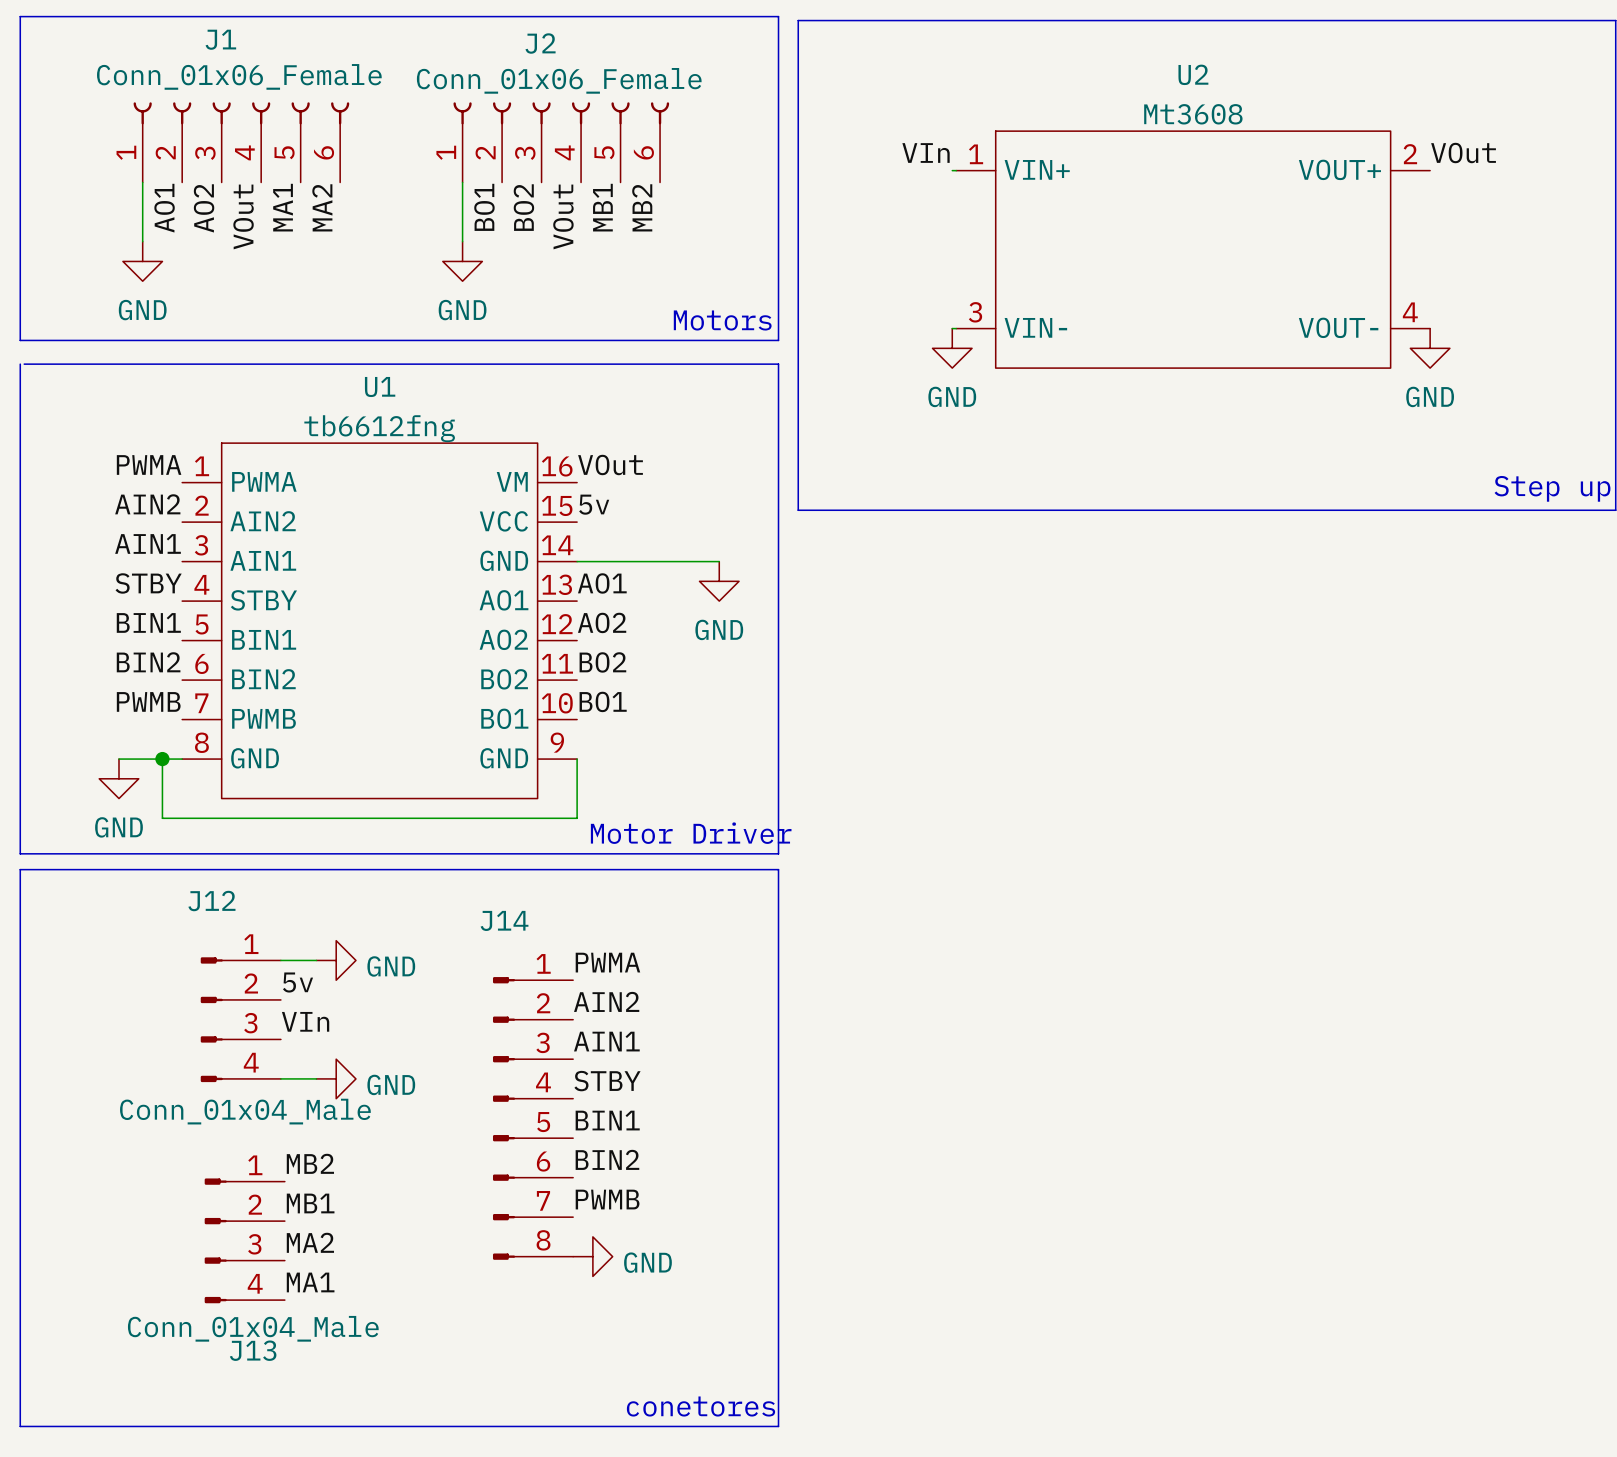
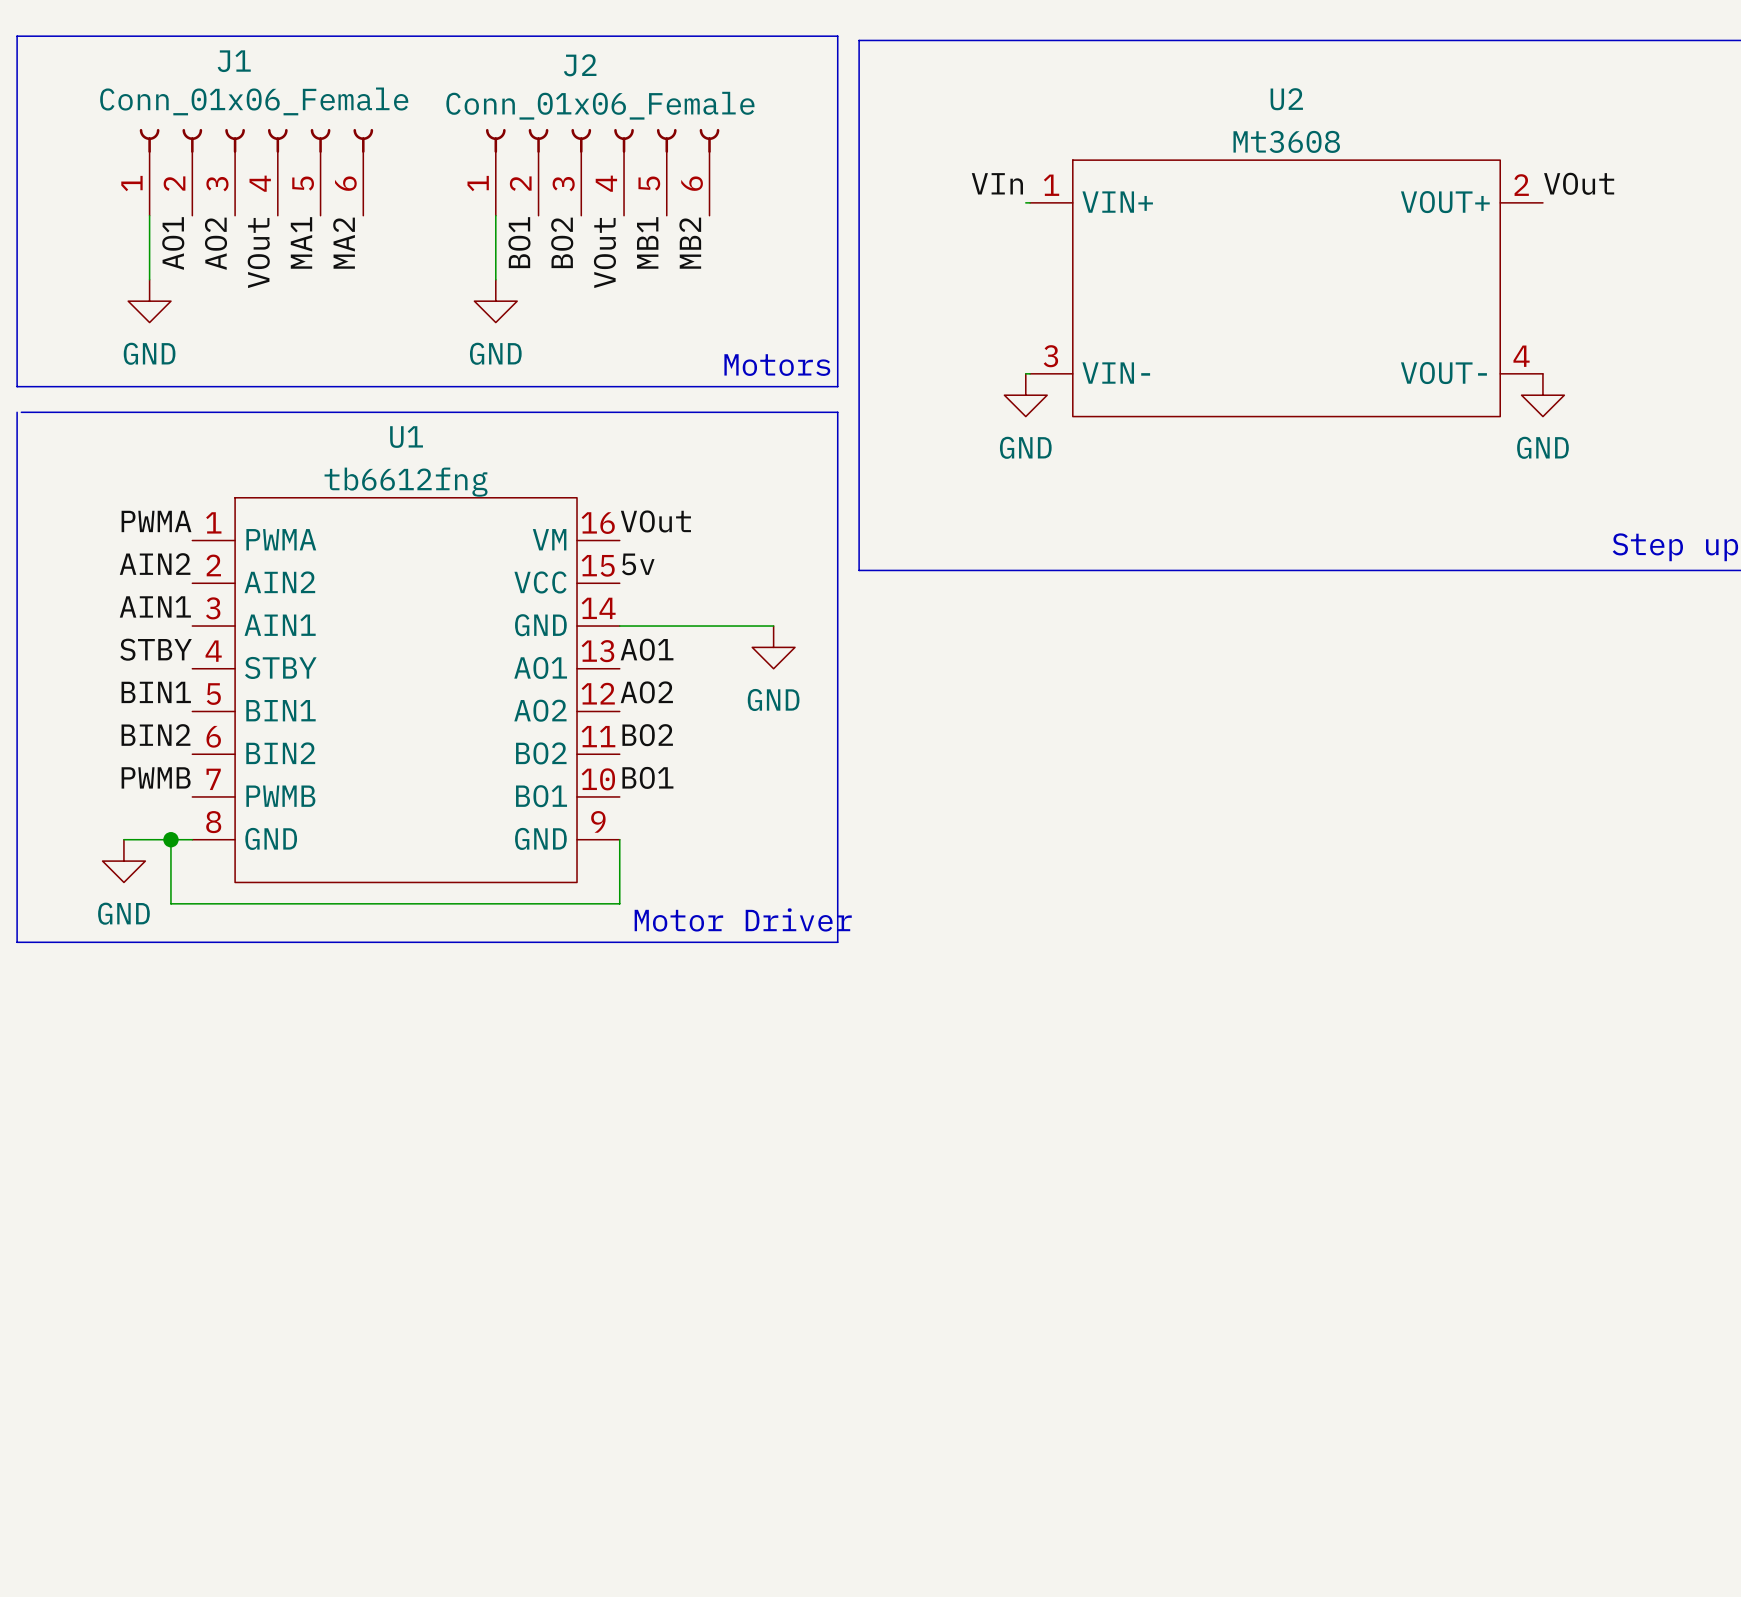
line: (20, 869) (778, 869) (778, 1426) (20, 1426) (20, 869) -> none
wire: (280, 960) (316, 960) -> none
power symbol: GND (336, 960) -> none
label: PWMA (607, 962) -> none
label: 5v (298, 982) -> none
label: AIN2 (606, 1001) -> none
J12: Conn_01x04_Male (240, 1019) -> none
label: VIn (305, 1021) -> none
label: AIN1 (606, 1041) -> none
wire: (280, 1078) (316, 1078) -> none
power symbol: GND (336, 1078) -> none
label: STBY (607, 1081) -> none
J14: (533, 1118) -> none
label: BIN1 (607, 1120) -> none
label: BIN2 (607, 1159) -> none
label: MB2 (310, 1163) -> none
label: PWMB (607, 1199) -> none
label: MB1 (310, 1203) -> none
J13: Conn_01x04_Male (244, 1240) -> none
label: MA2 (310, 1242) -> none
power symbol: GND (592, 1256) -> none
label: MA1 (310, 1282) -> none
text: conetores (700, 1406) -> none

